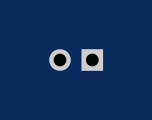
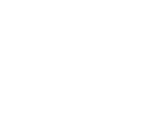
part: (76, 60) -> none

